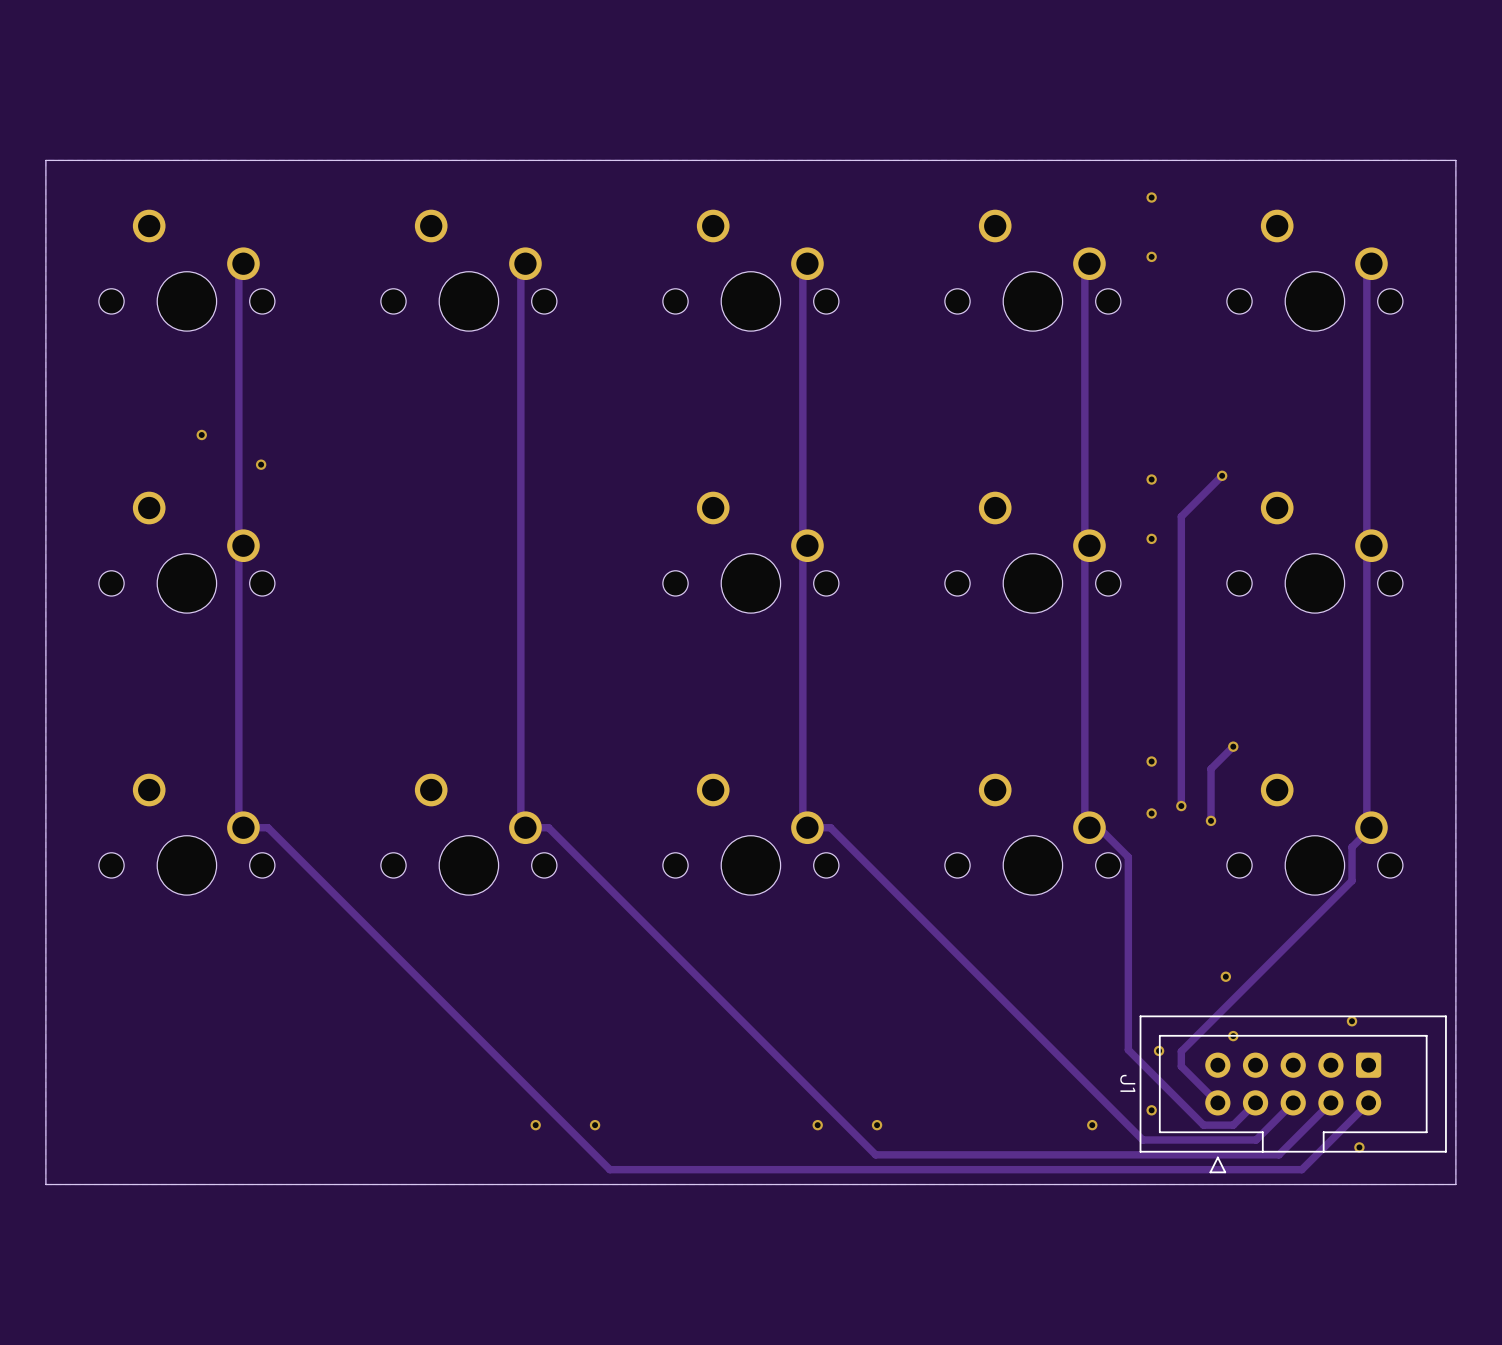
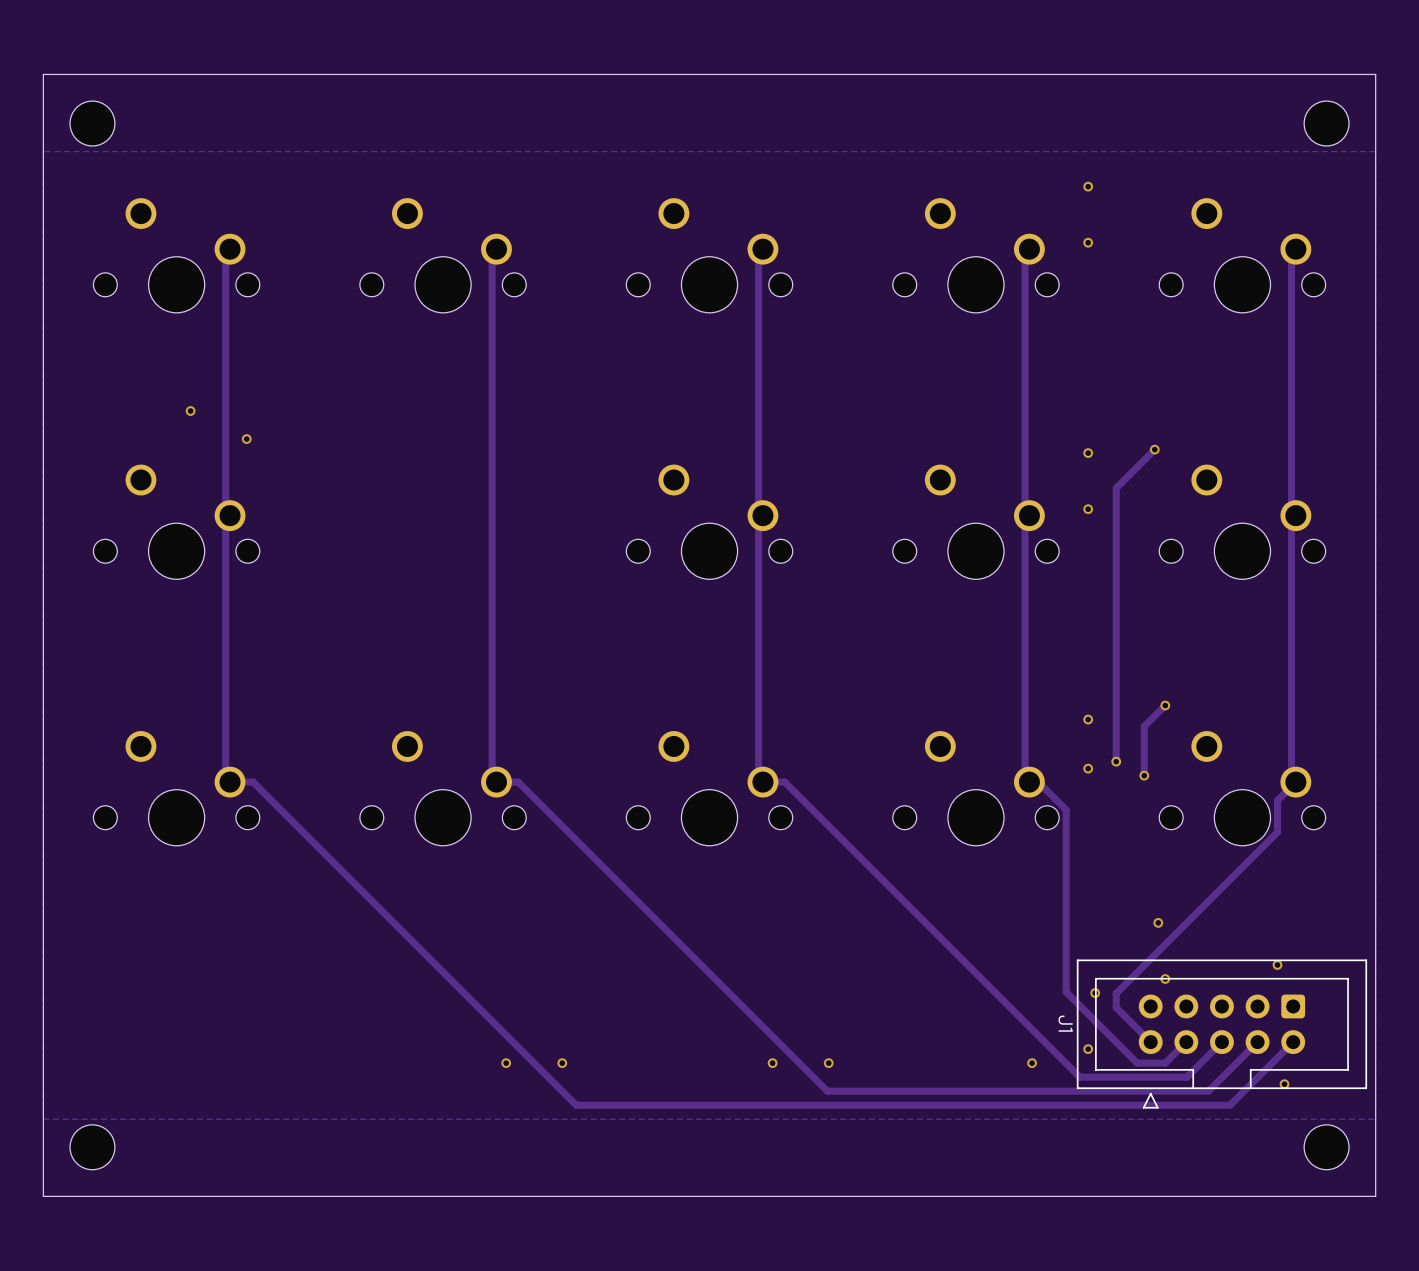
part: none -> (92, 123)
part: none -> (1326, 123)
board edge: (1455, 160) (45, 160) -> (1375, 151) (1375, 74) (43, 74) (43, 151)
board edge: (1455, 1184) (45, 1184) -> (1375, 1119) (1375, 1196) (43, 1196) (43, 1119)
part: none -> (92, 1147)
part: none -> (1326, 1147)

